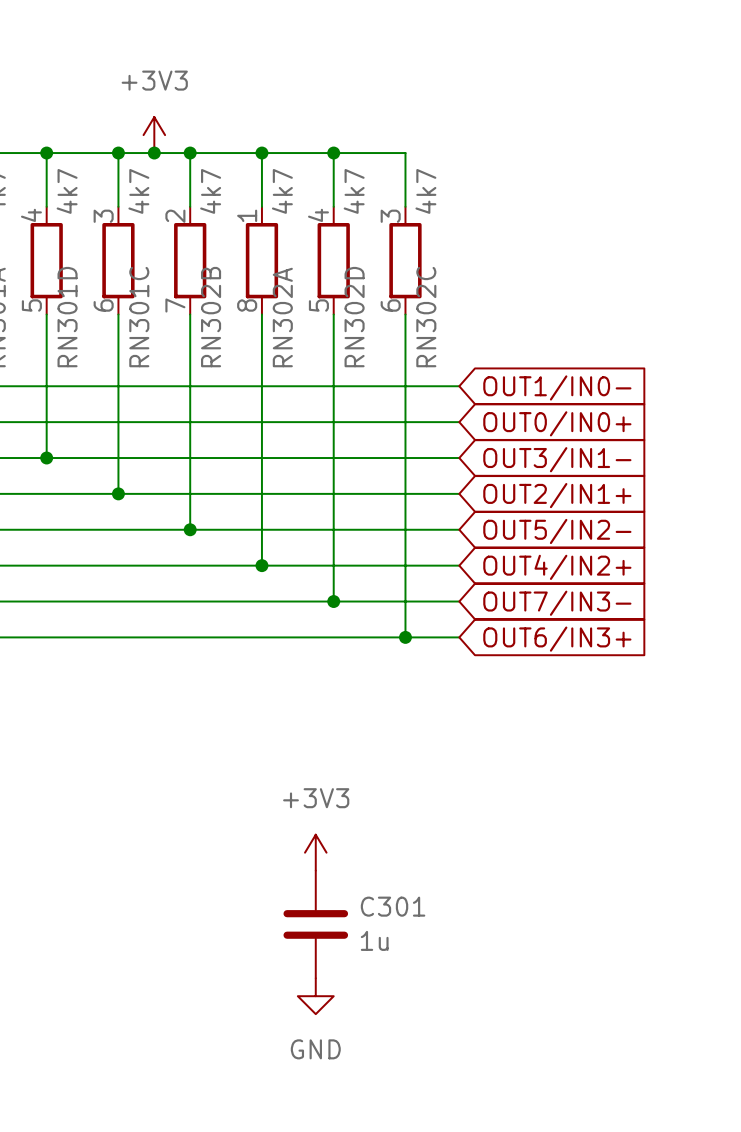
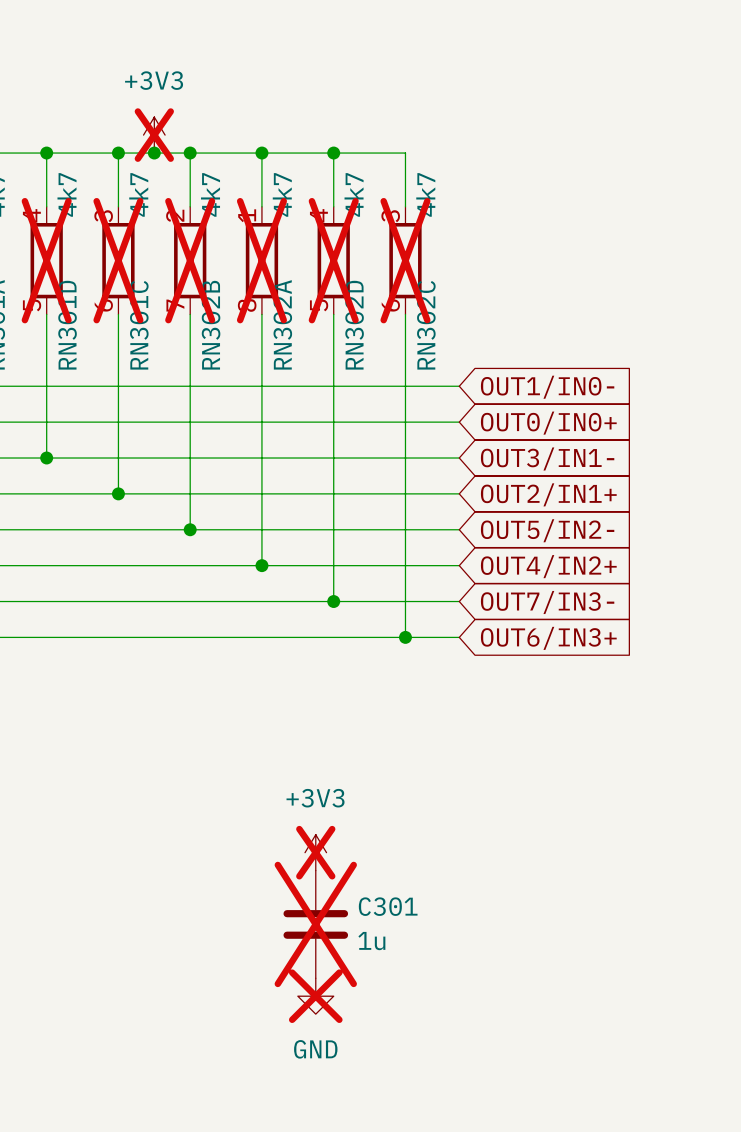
power symbol do-not-place cross: none -> (154, 135)
RN301D do-not-place cross: none -> (46, 260)
RN301C do-not-place cross: none -> (118, 260)
RN302B do-not-place cross: none -> (190, 260)
RN302A do-not-place cross: none -> (261, 260)
RN302D do-not-place cross: none -> (333, 260)
RN302C do-not-place cross: none -> (405, 260)
power symbol do-not-place cross: none -> (315, 852)
C301 do-not-place cross: none -> (315, 924)
power symbol do-not-place cross: none -> (315, 996)

